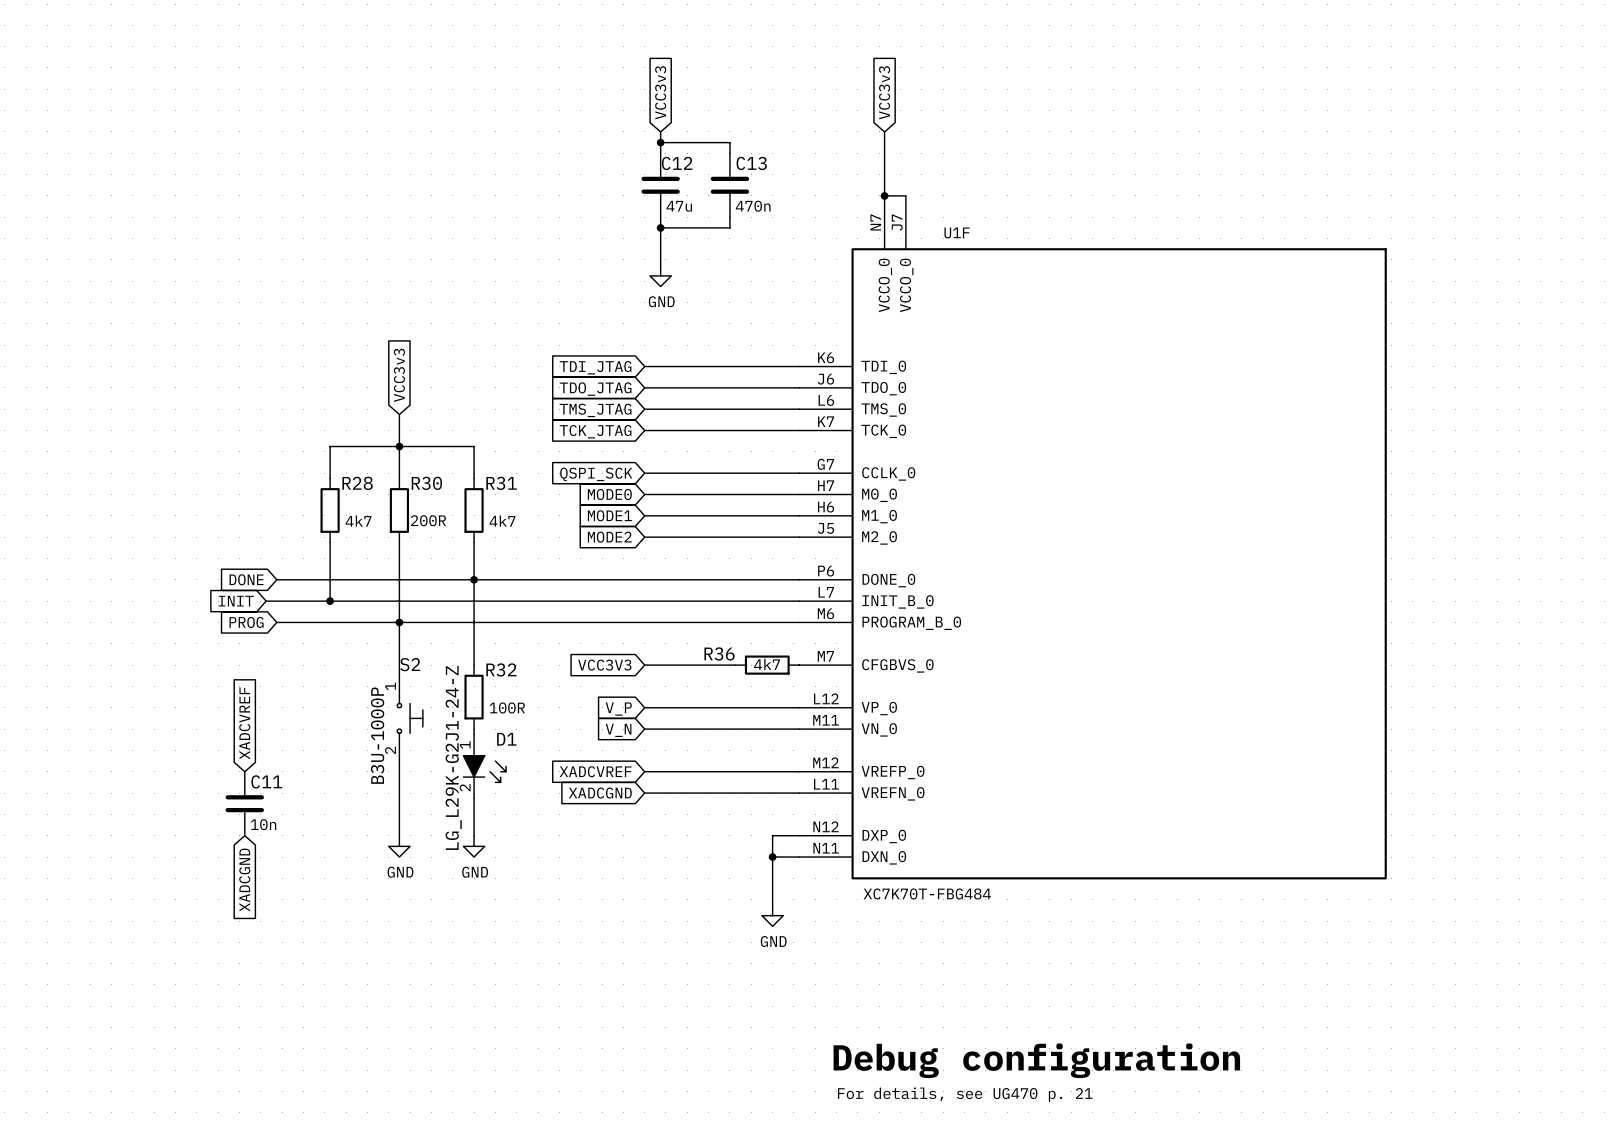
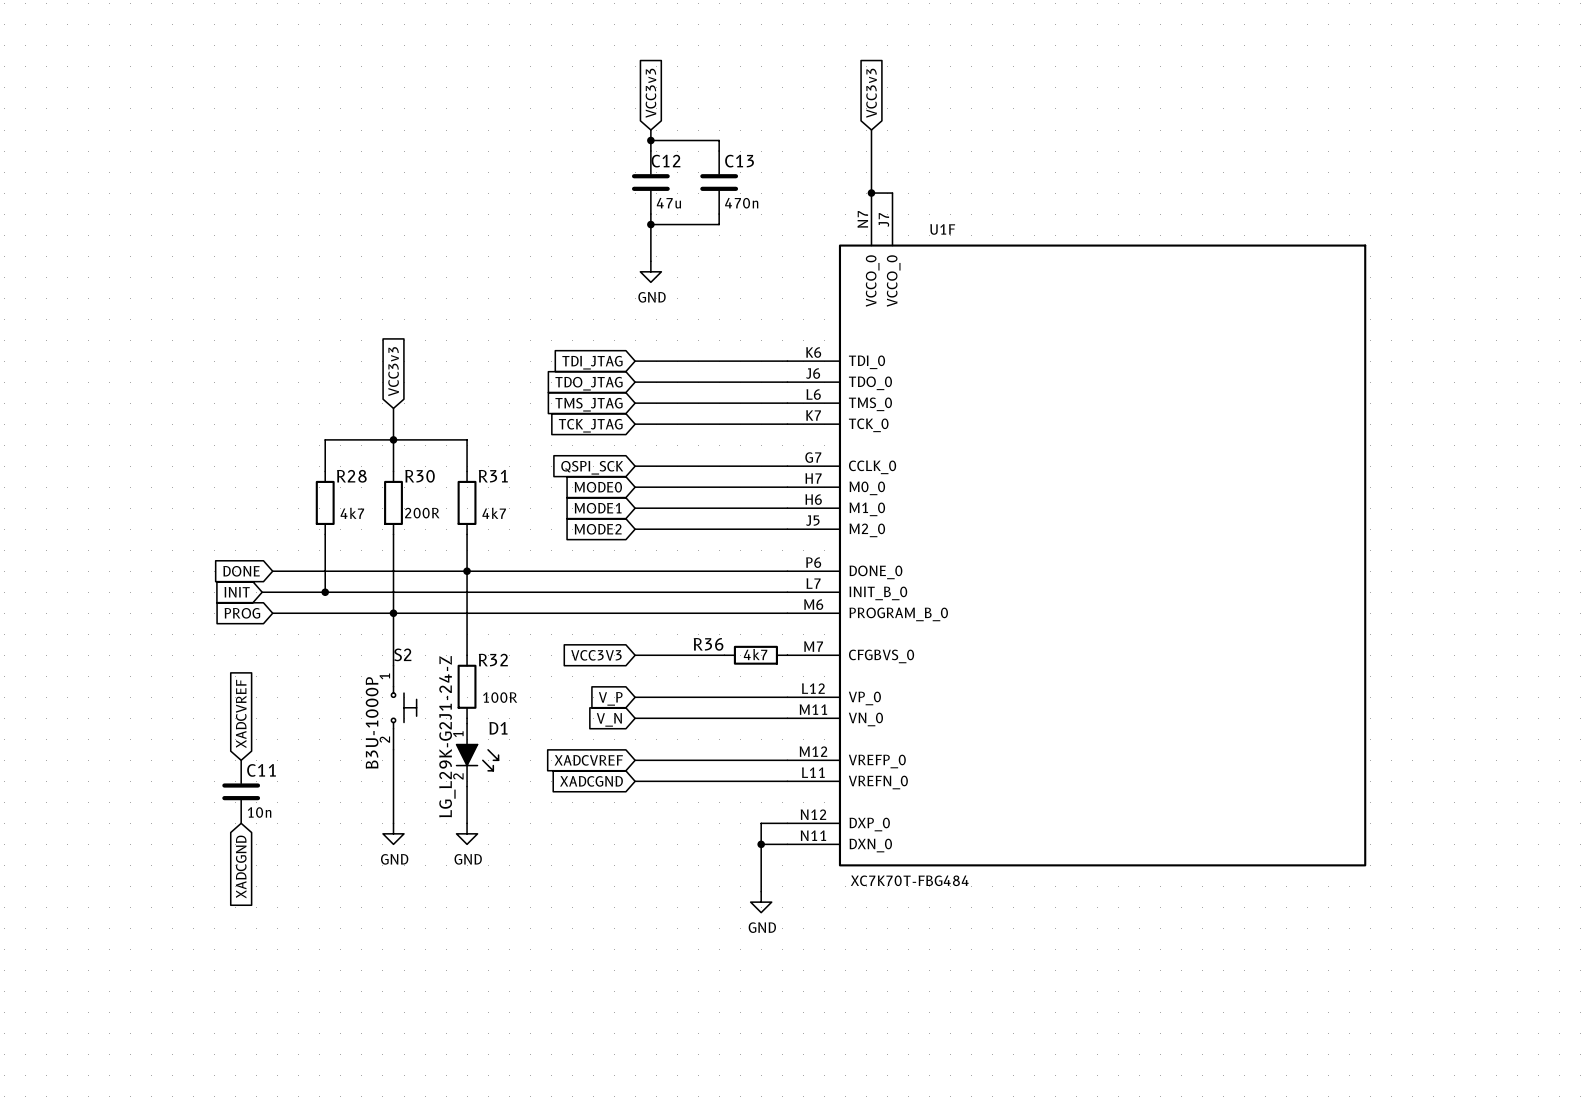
text: Debug configuration (1036, 1060) -> none
text: For details, see UG470 p. 21 (965, 1094) -> none

